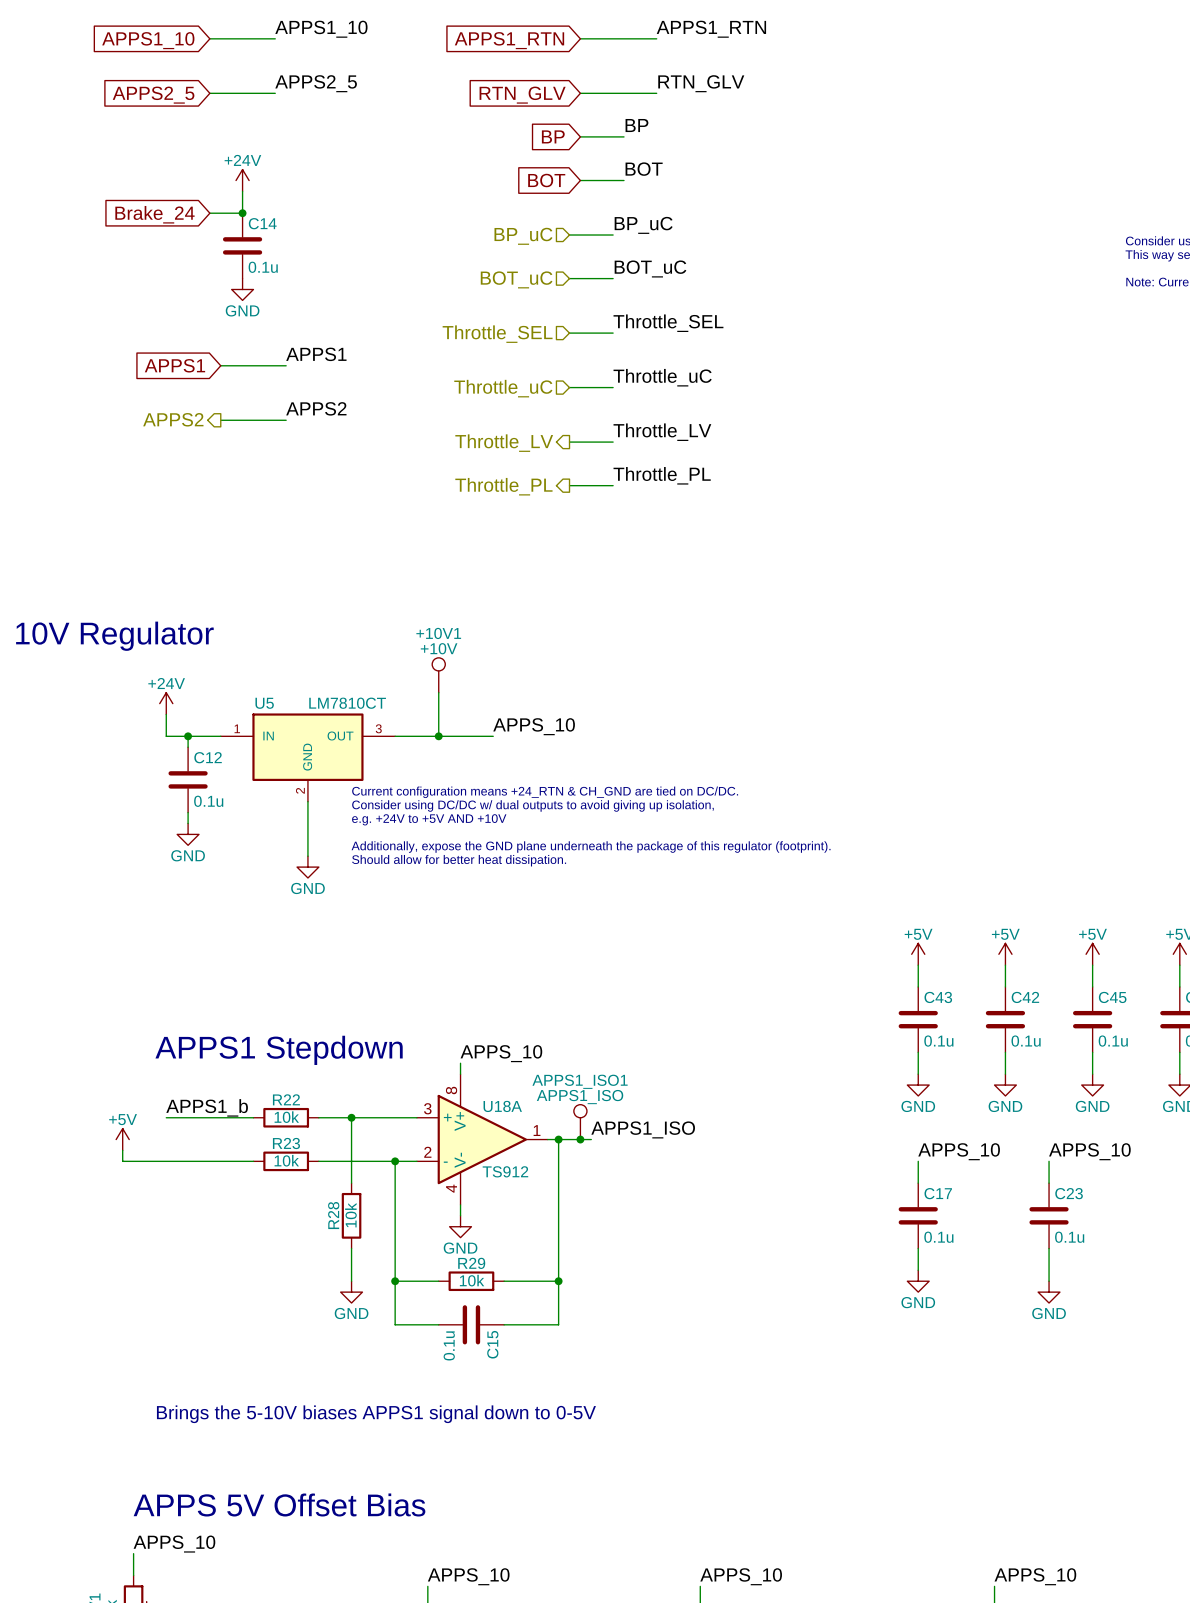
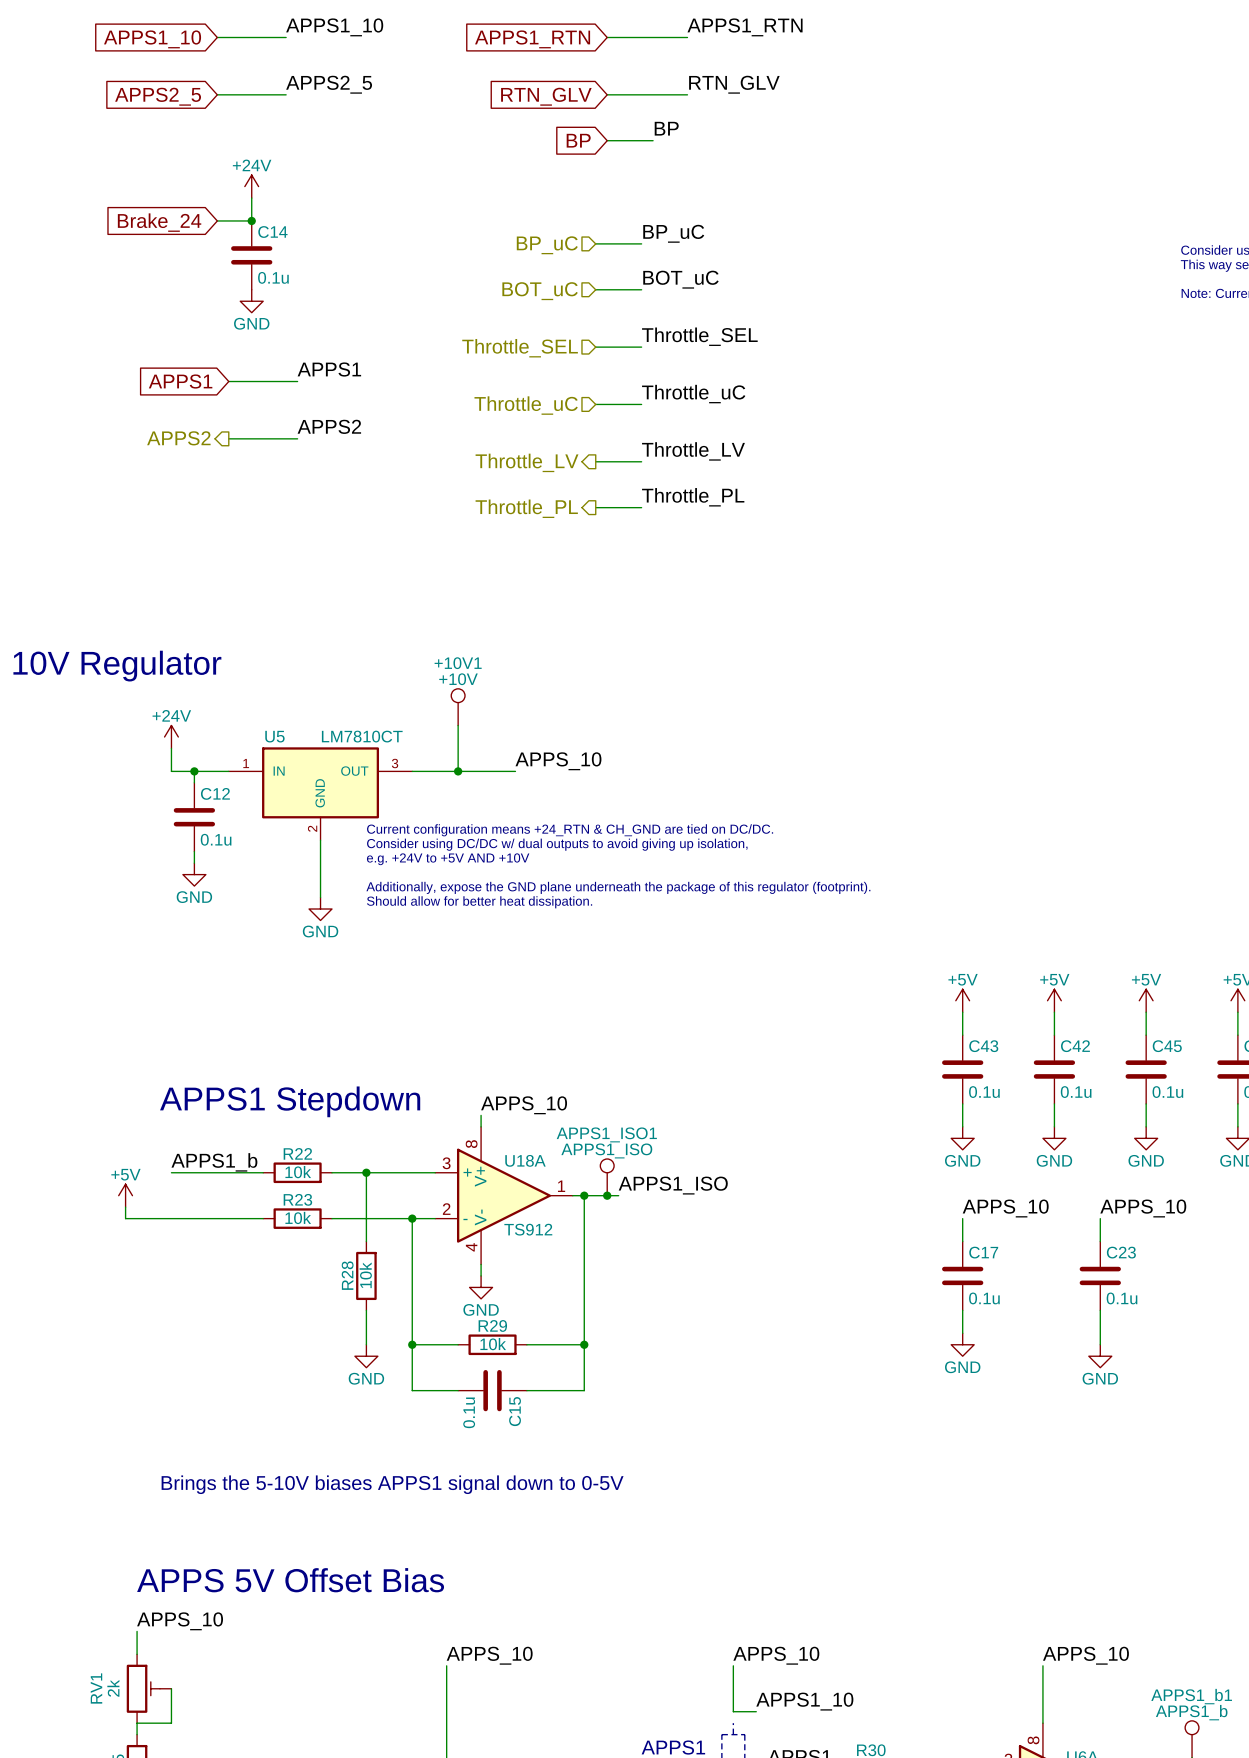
label: BOT (644, 169) -> none
global label: BOT (546, 180) -> none
wire: (580, 180) (624, 180) -> none

